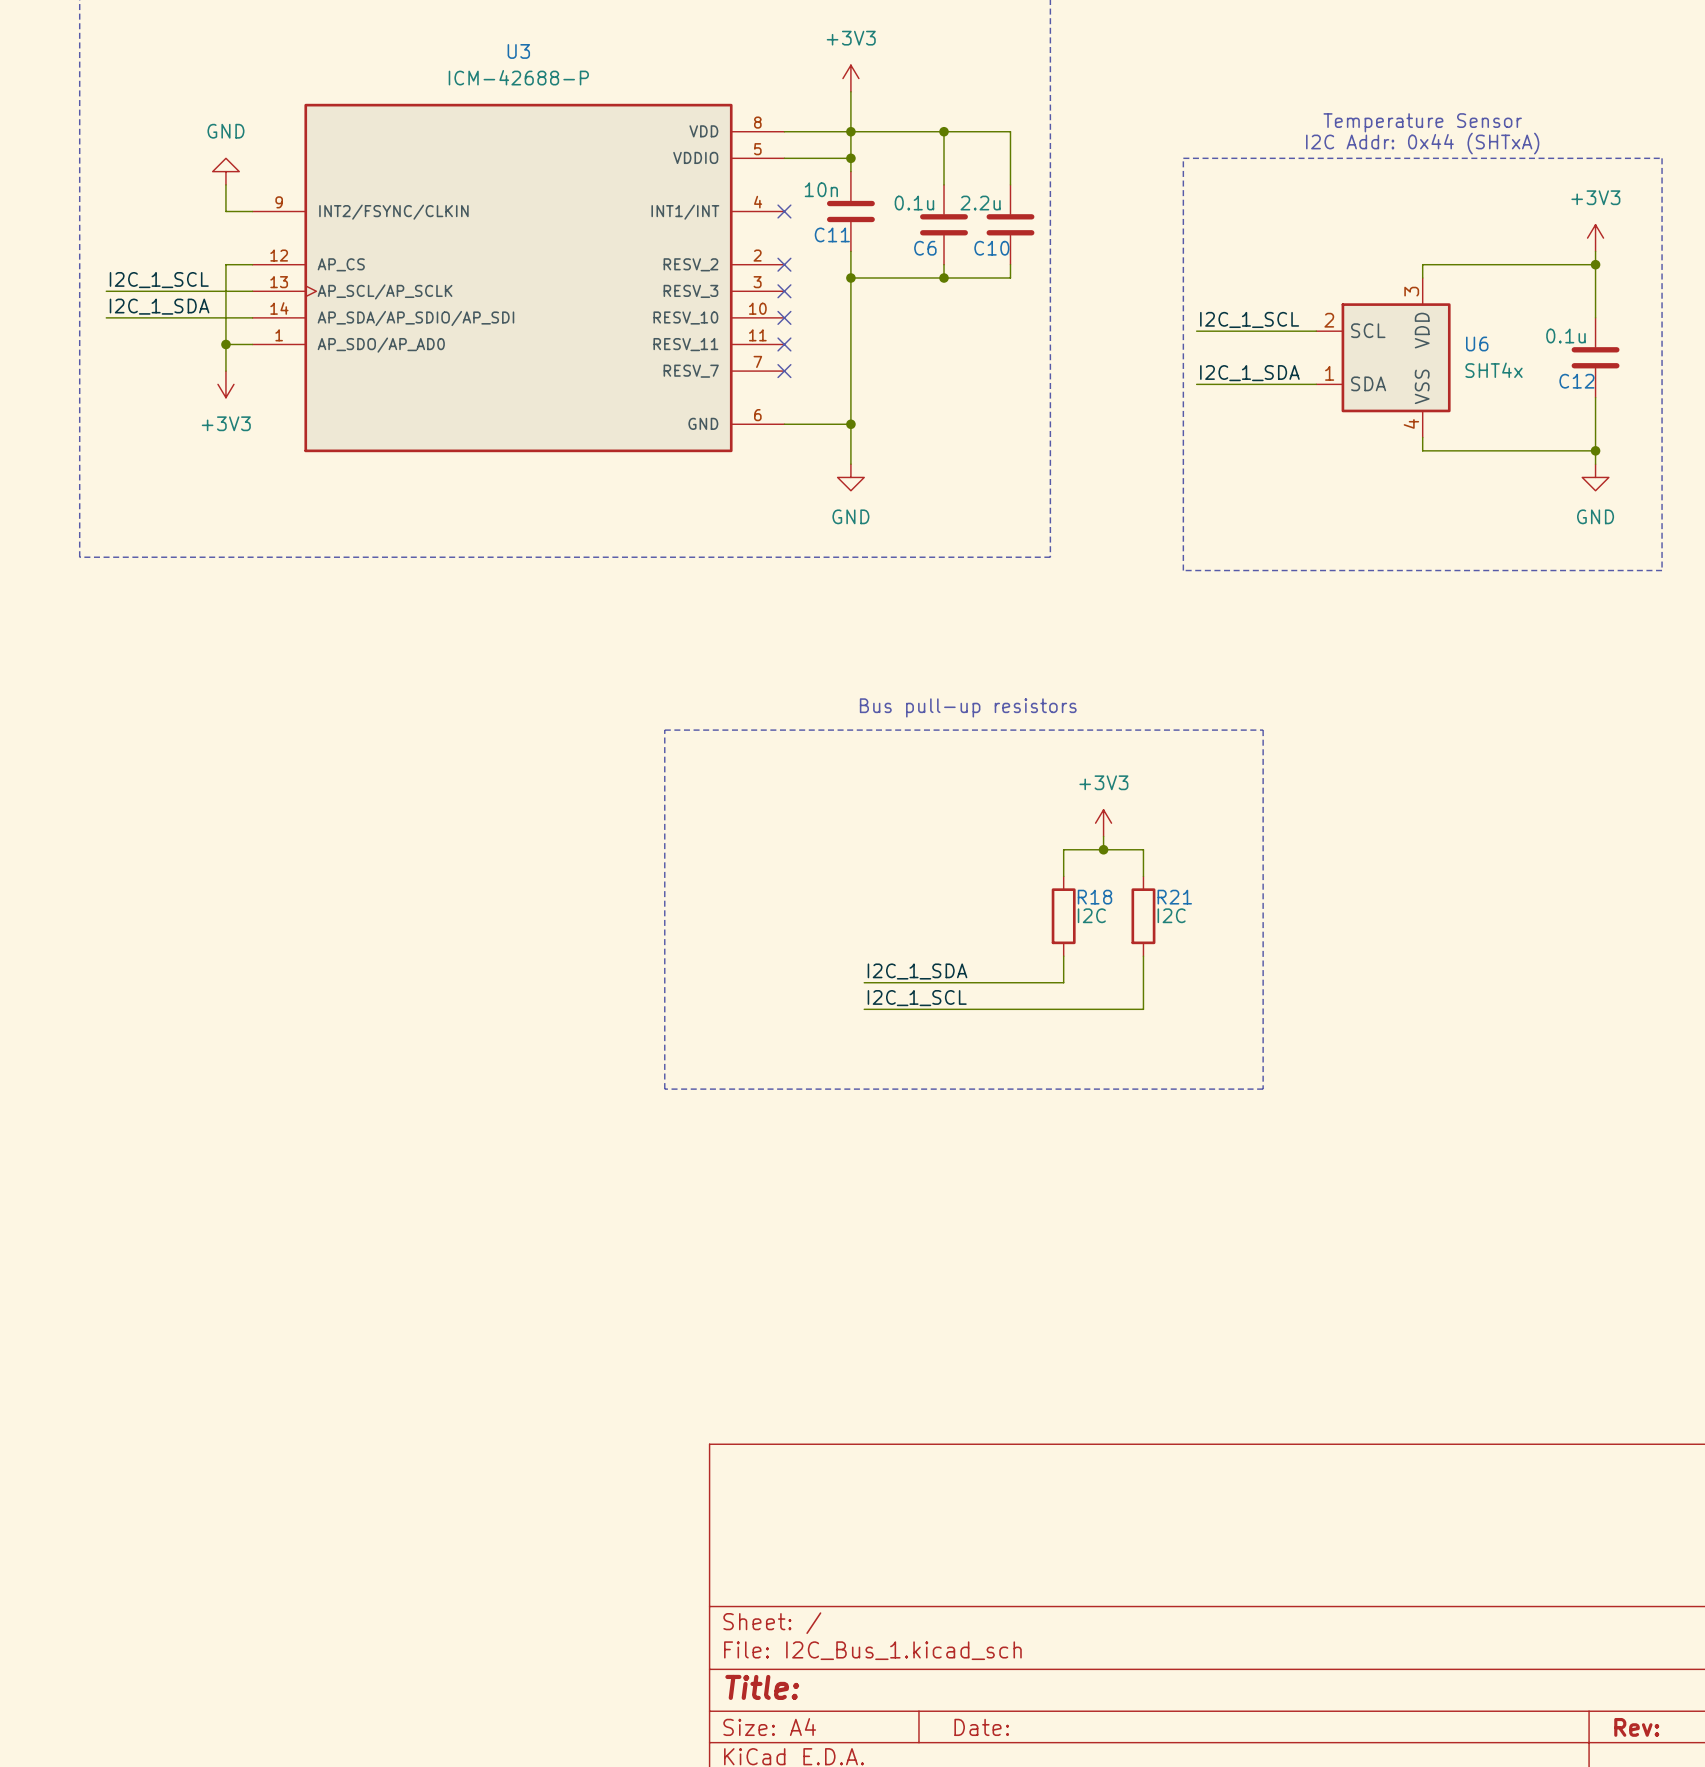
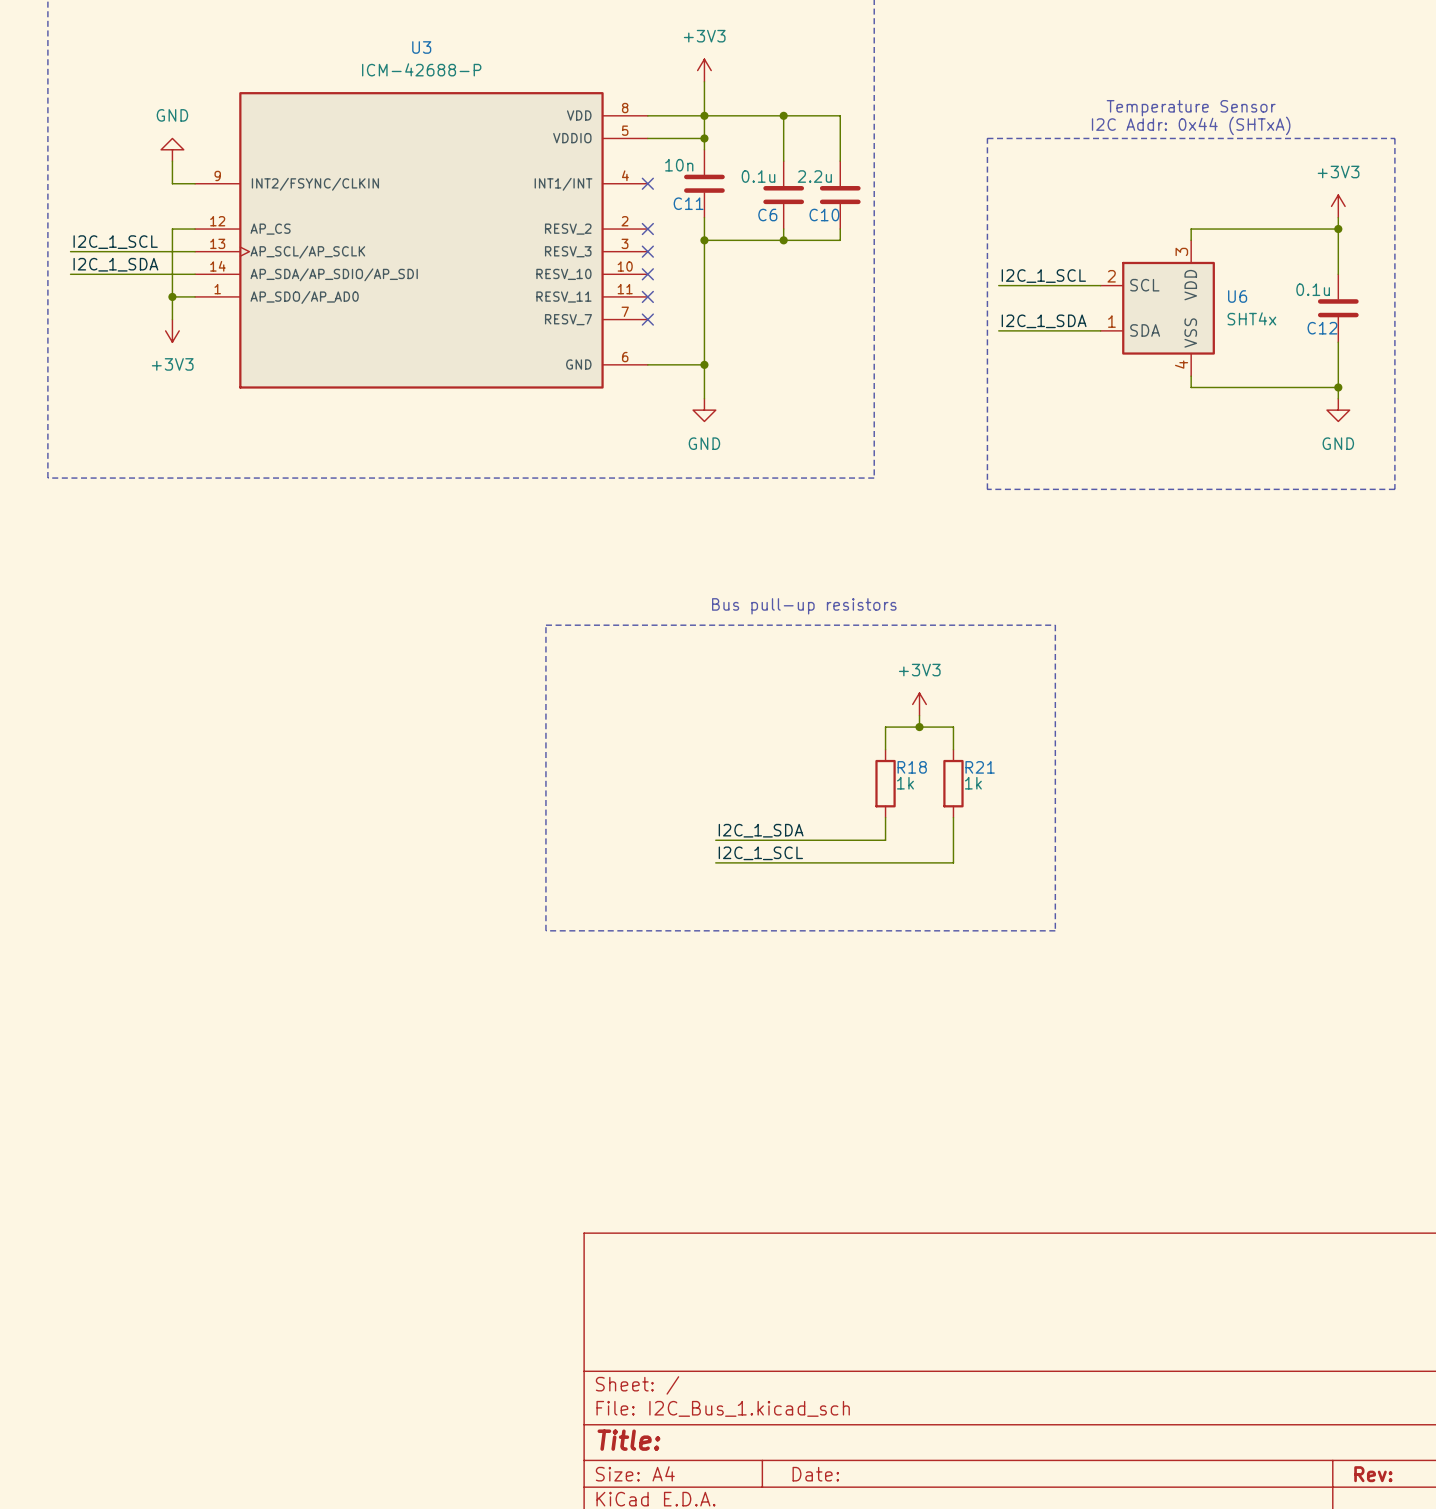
R18 value: I2C (1091, 915) -> 1k (905, 783)
R21 value: I2C (1171, 915) -> 1k (973, 783)

